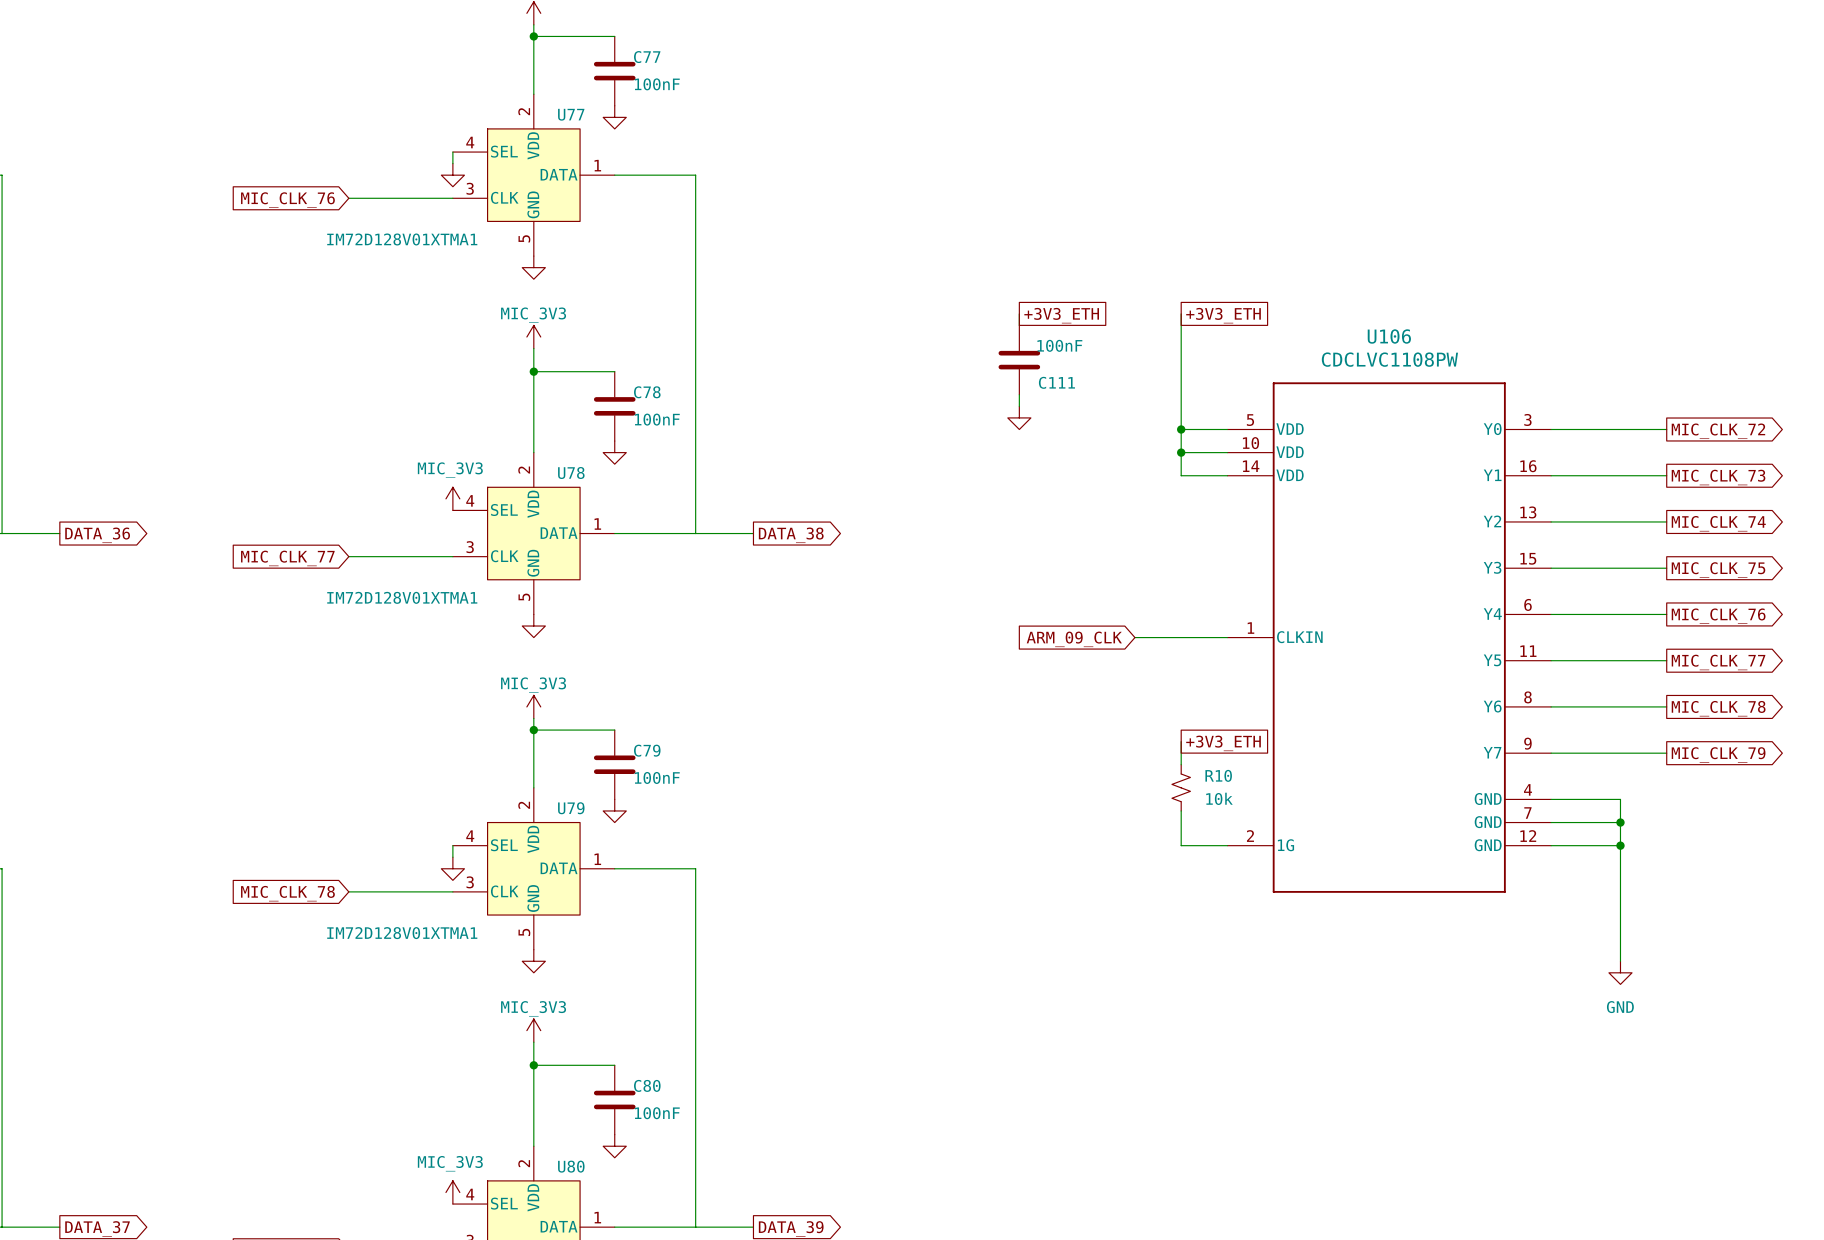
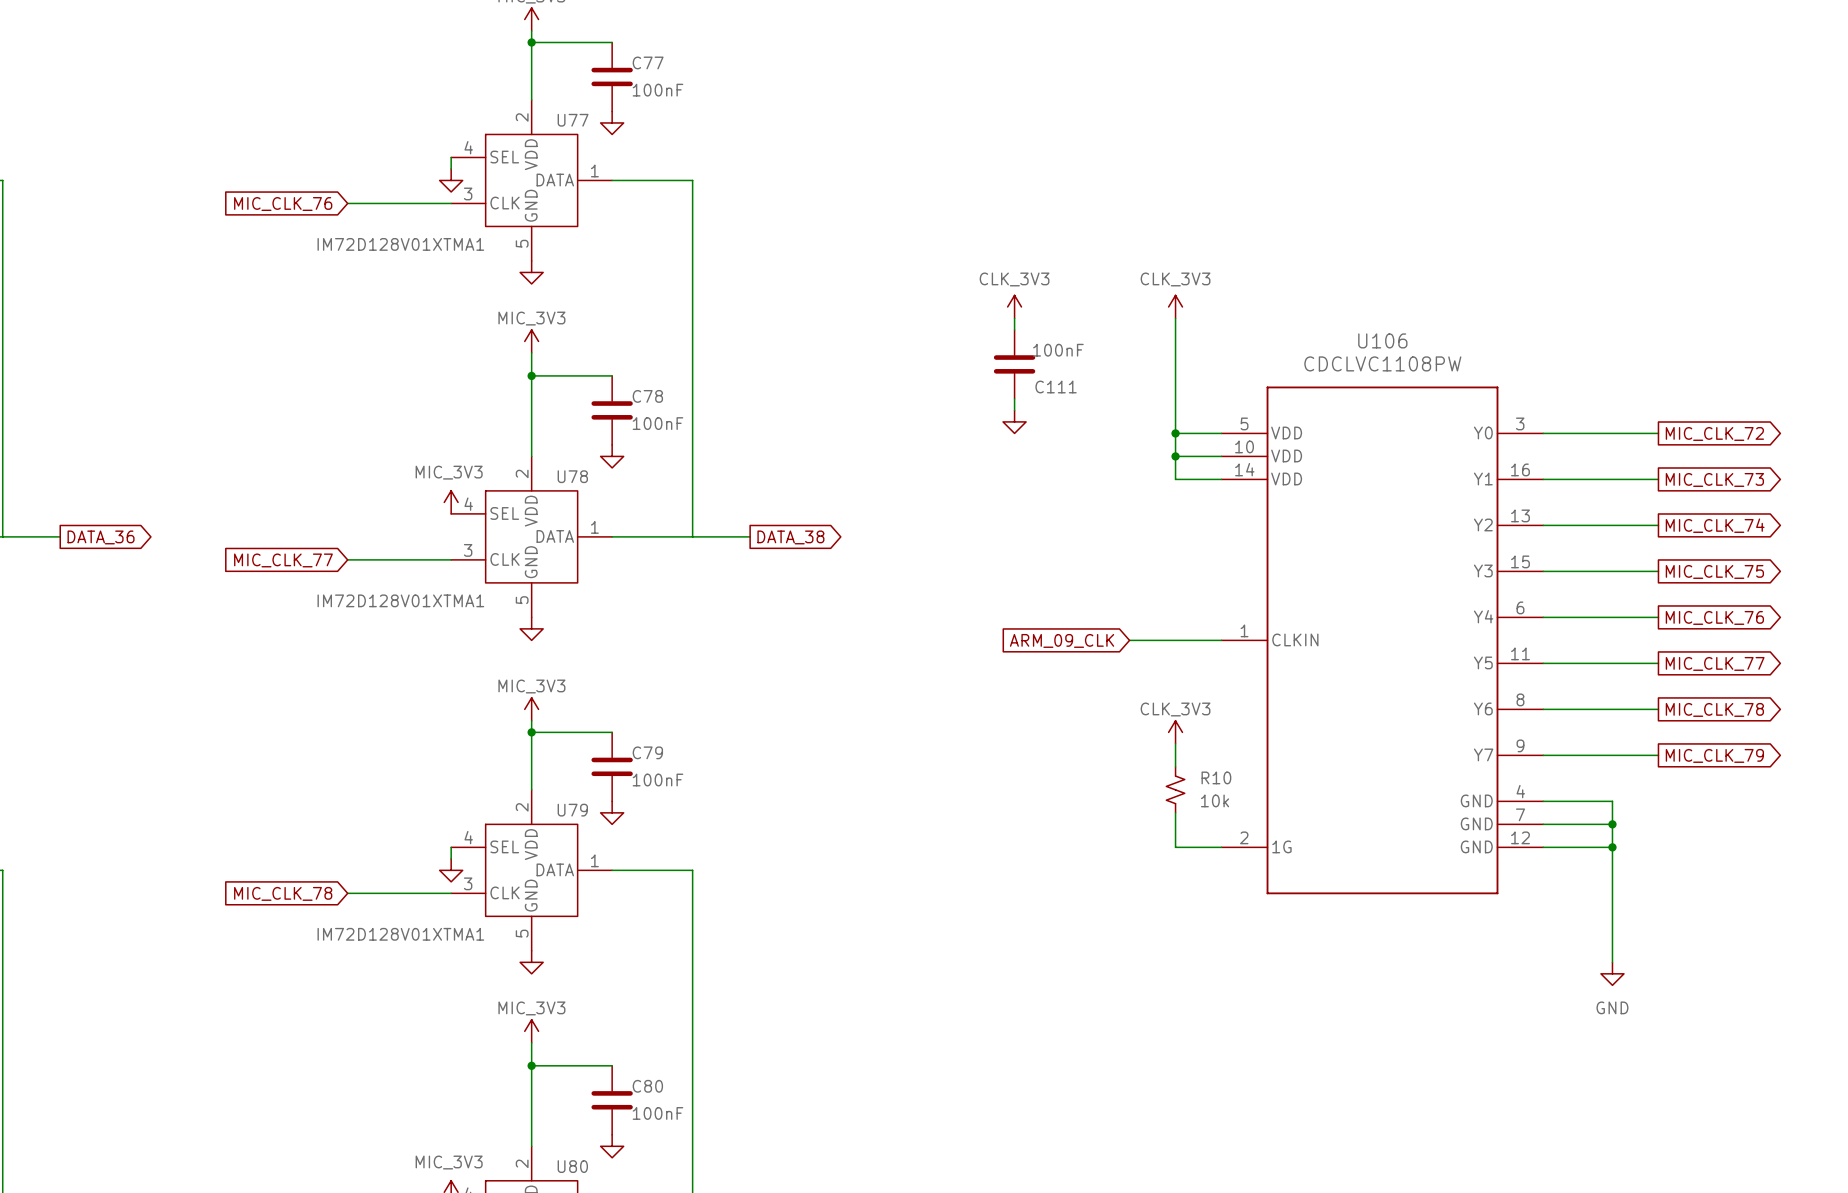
power symbol: none -> CLK_3V3 (1014, 306)
power symbol: none -> CLK_3V3 (1175, 306)
global label: +3V3_ETH (1061, 315) -> none
global label: +3V3_ETH (1223, 315) -> none
power symbol: none -> CLK_3V3 (1175, 732)
global label: +3V3_ETH (1223, 743) -> none

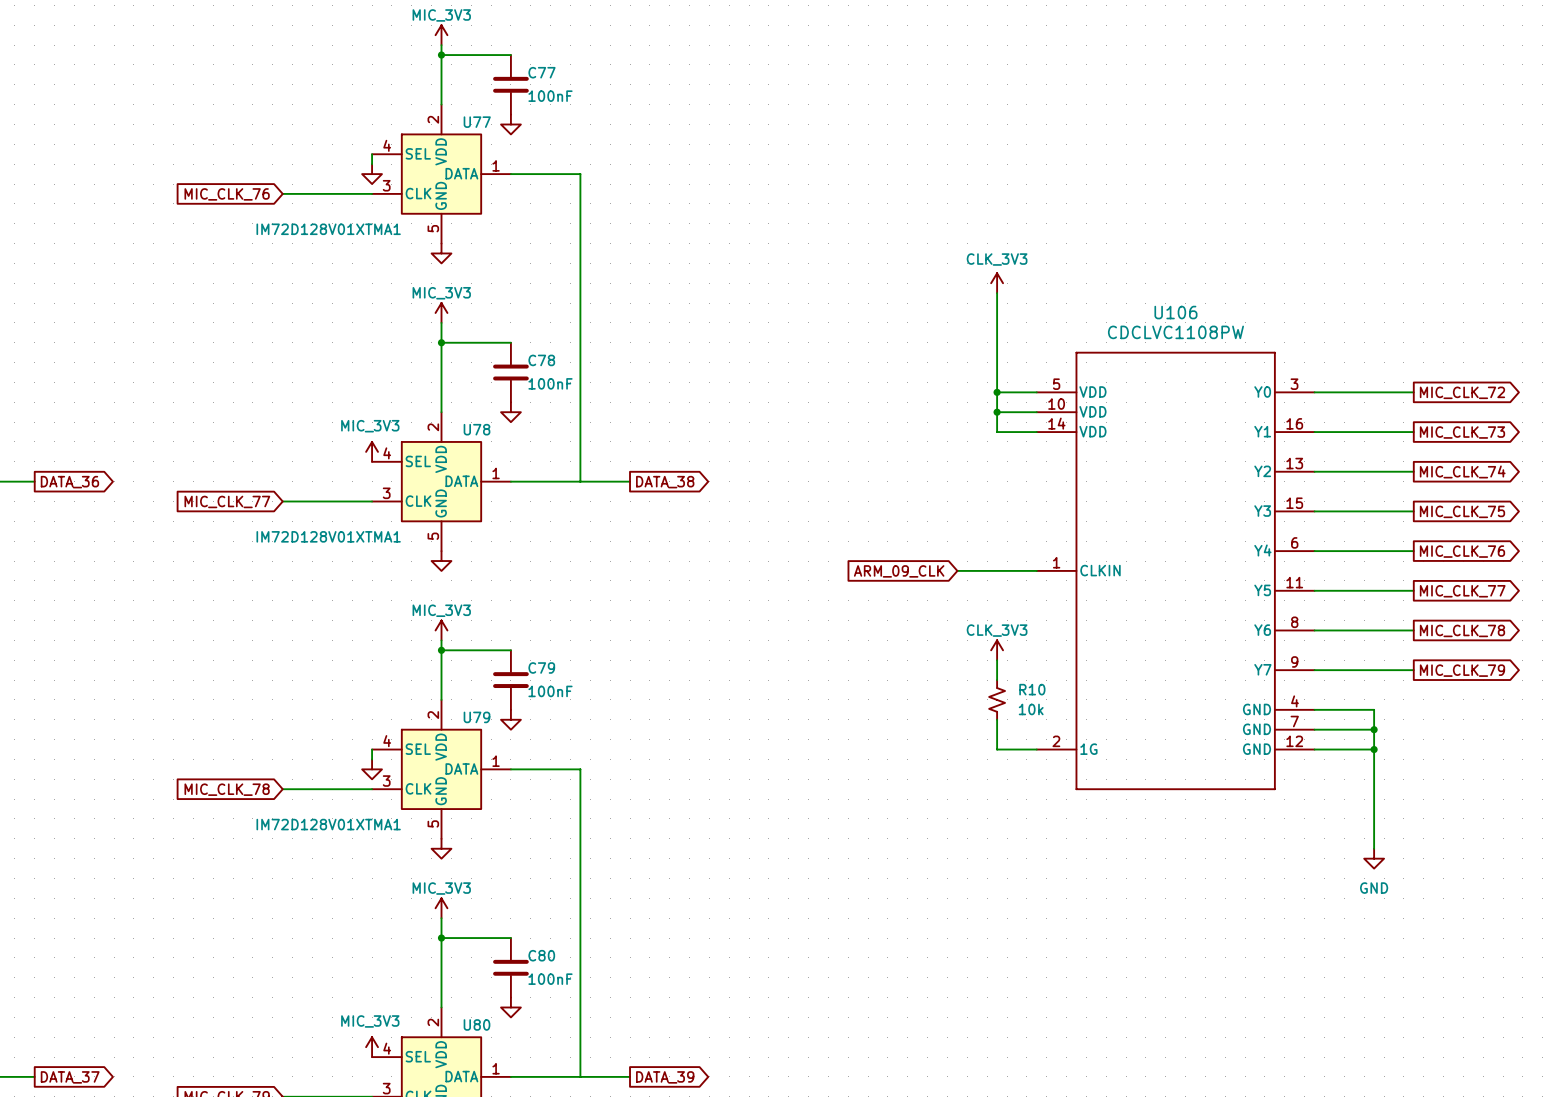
power symbol: CLK_3V3 (1014, 306) -> none
wire: (1014, 318) (1014, 329) -> none
C111: 100nF (1014, 364) -> none
wire: (1014, 398) (1014, 410) -> none
power symbol: (1014, 421) -> none

